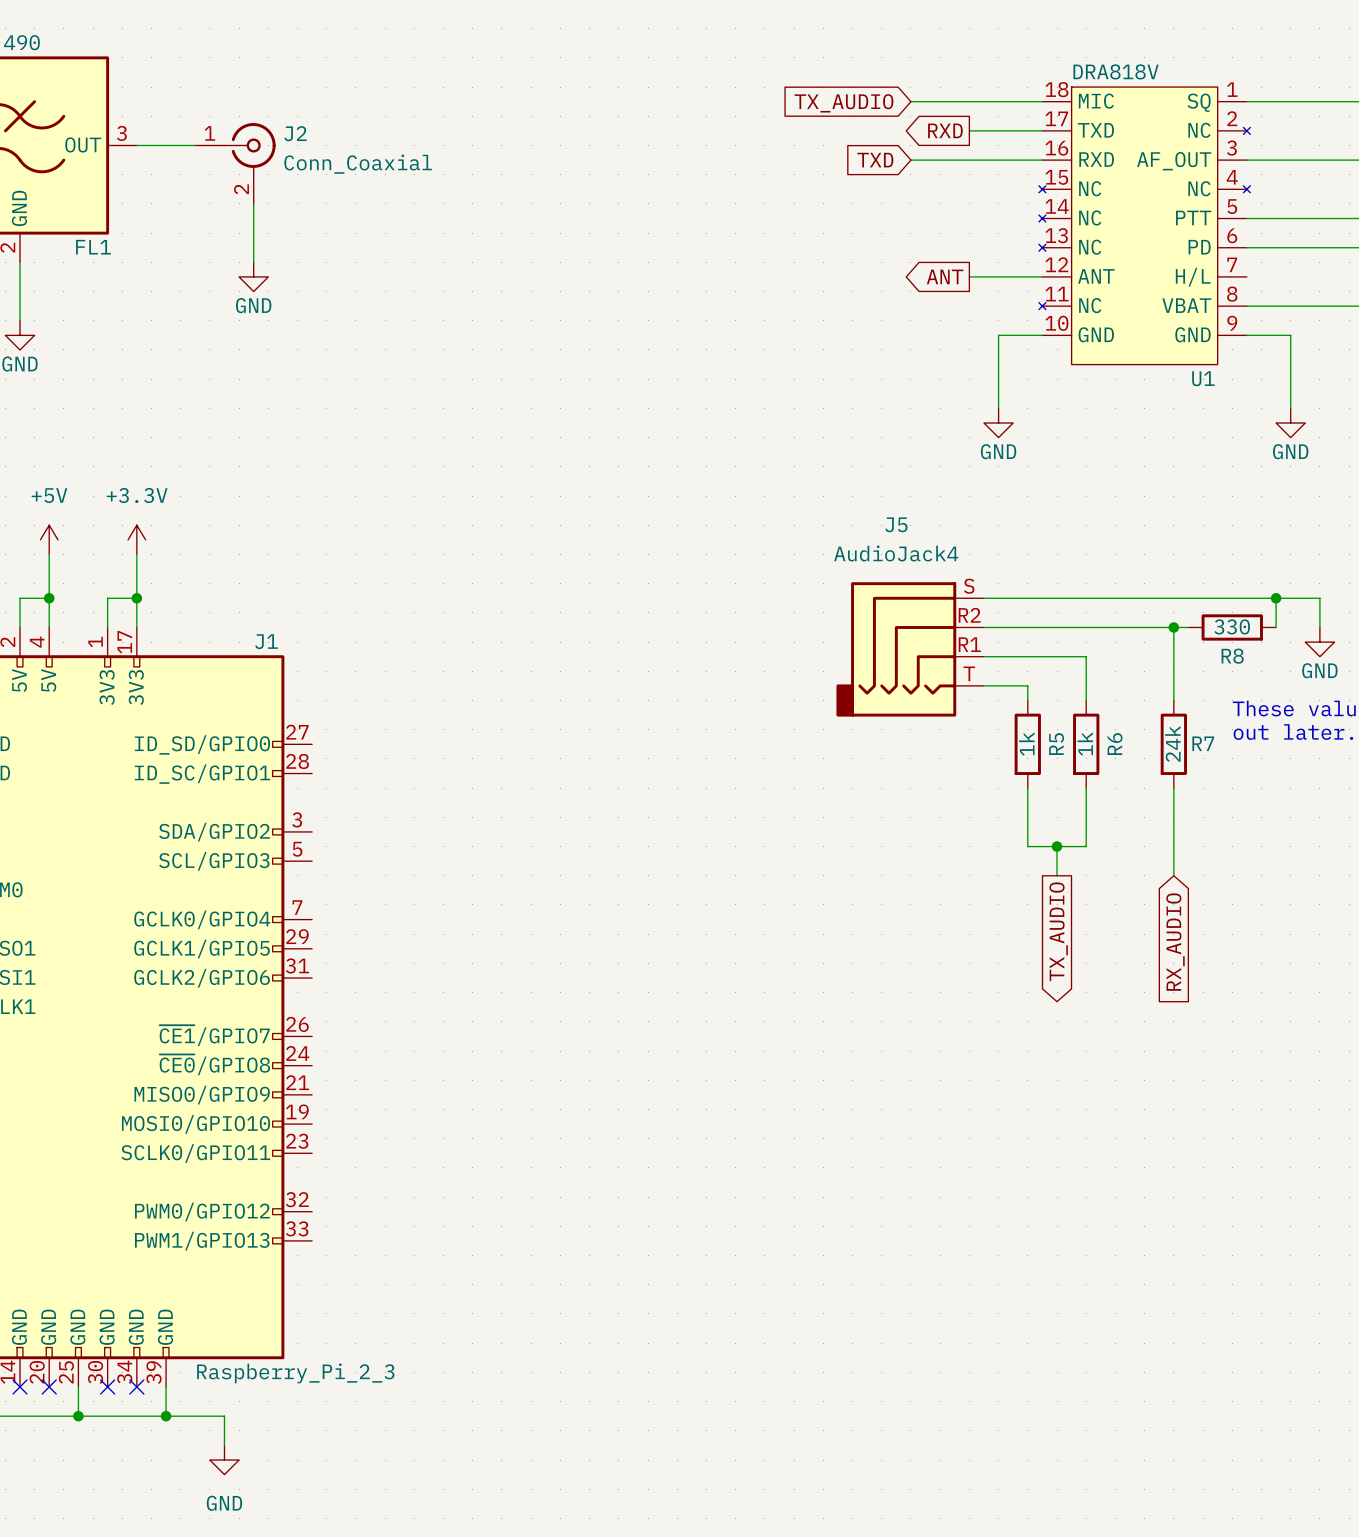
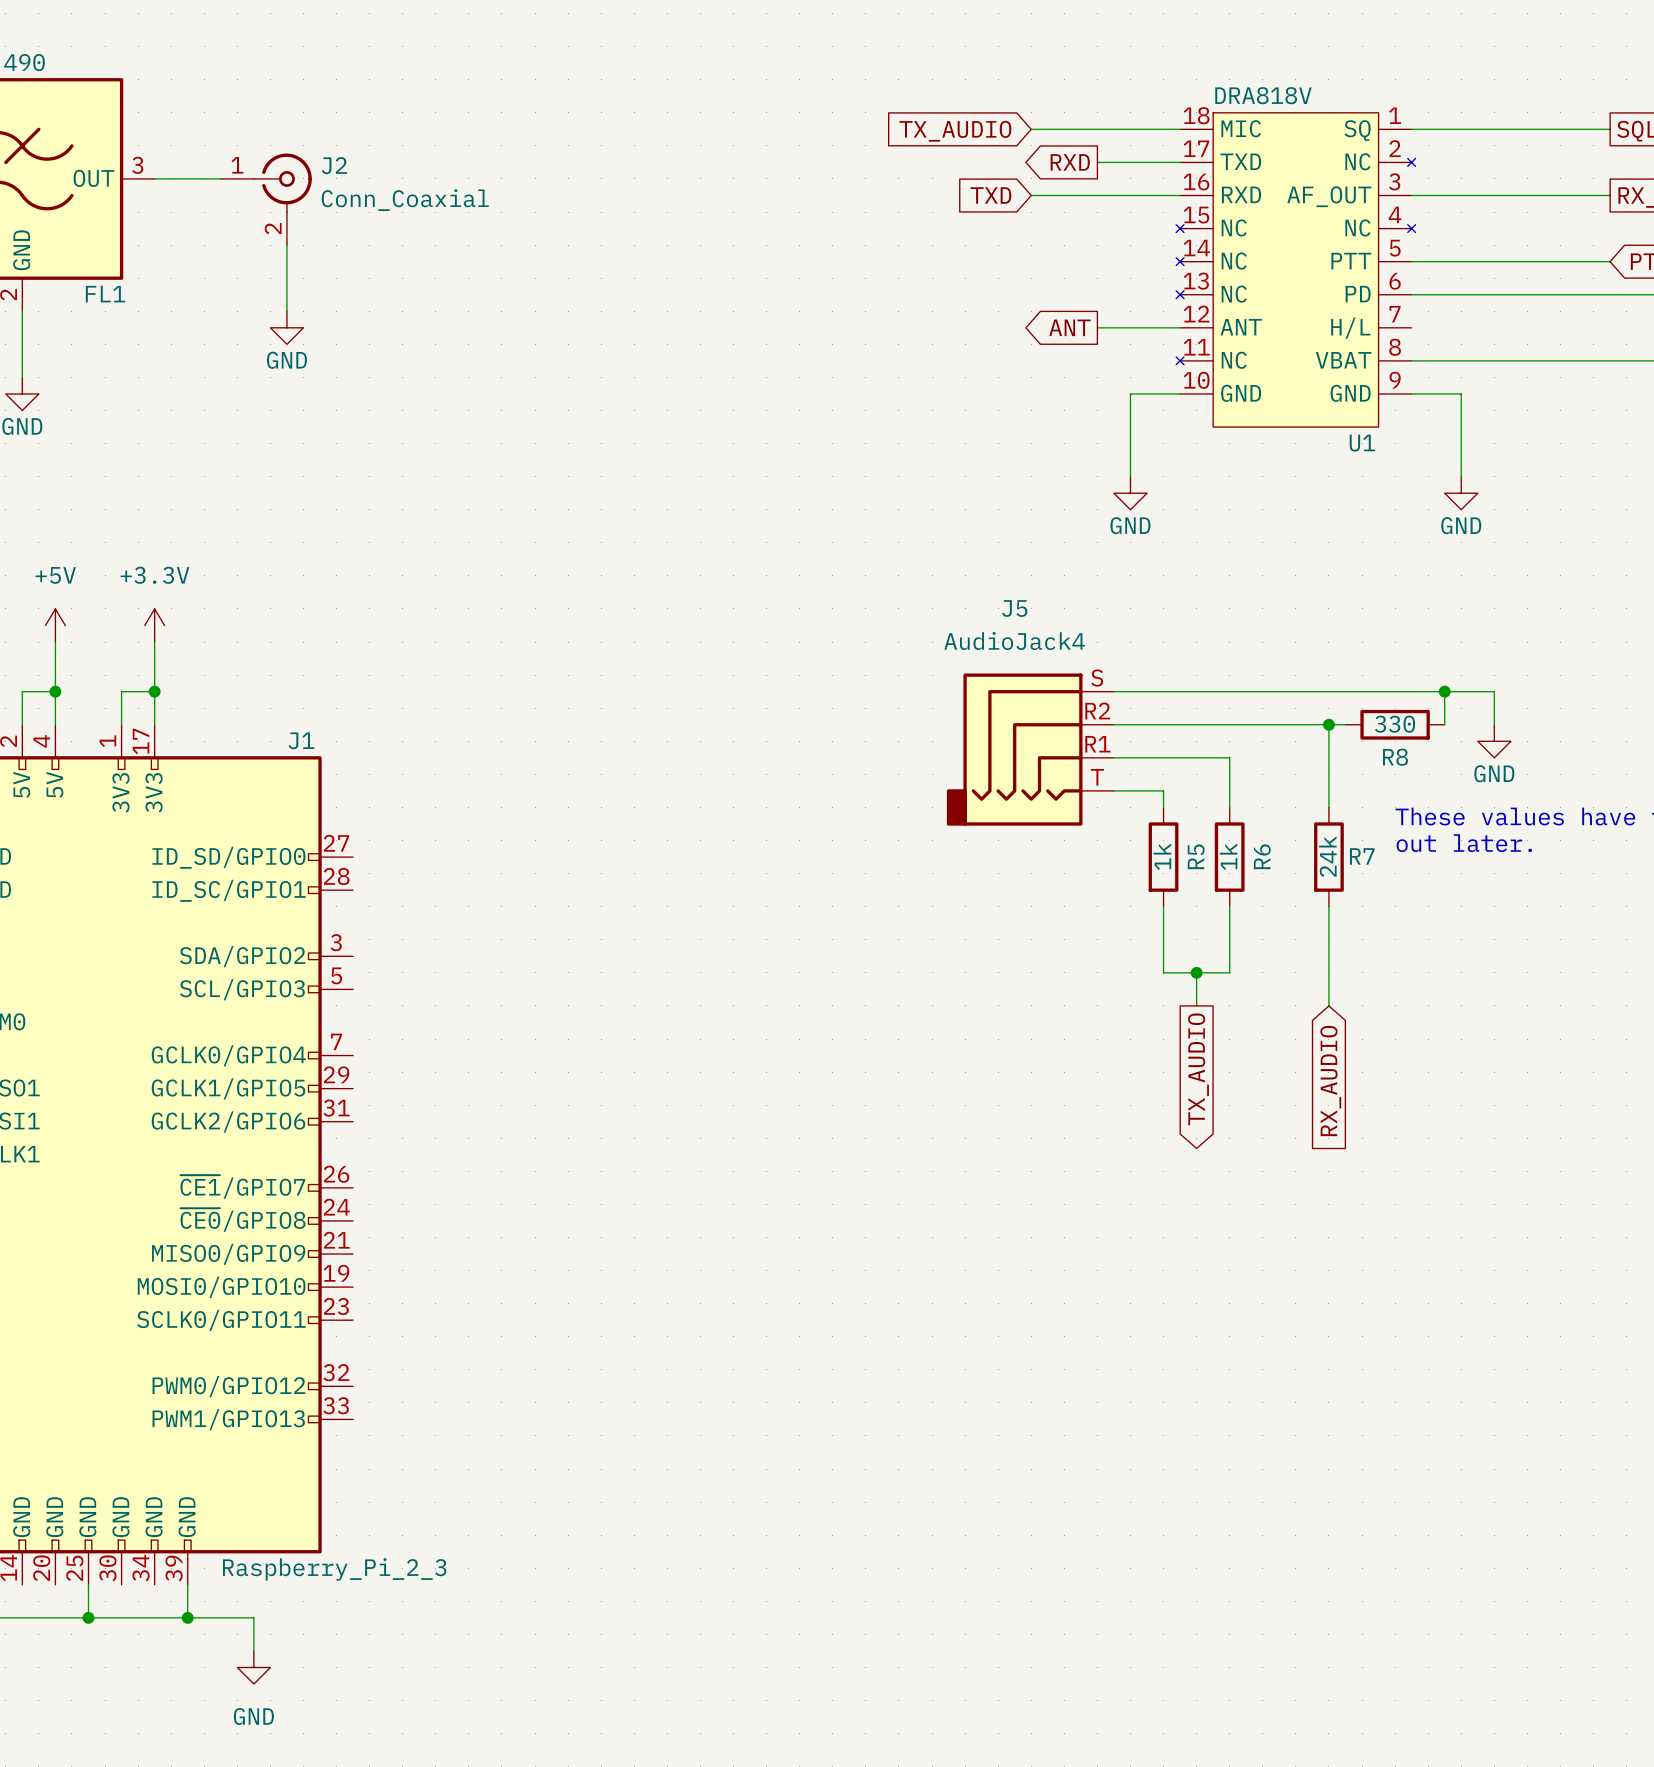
no-connect mark: (20, 1386) -> none
no-connect mark: (49, 1386) -> none
no-connect mark: (107, 1386) -> none
no-connect mark: (136, 1386) -> none

